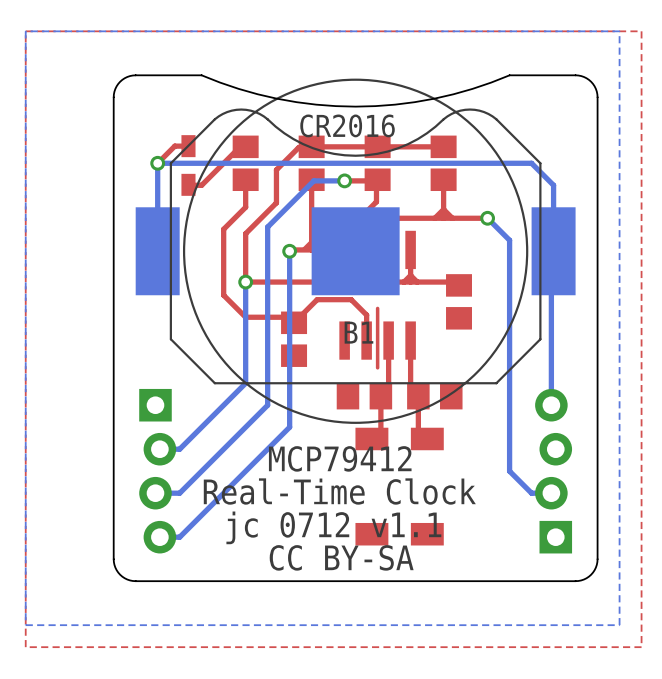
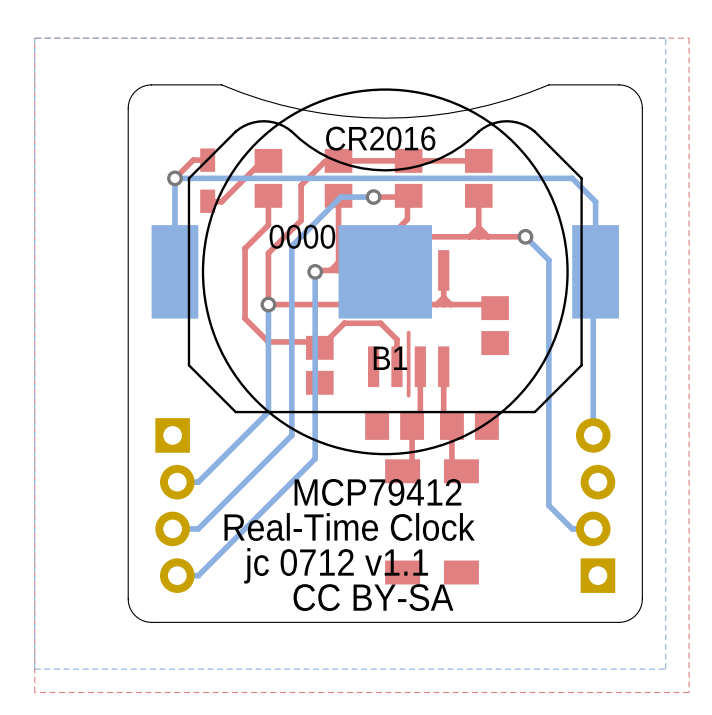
text: none -> 0000 (302, 236)

